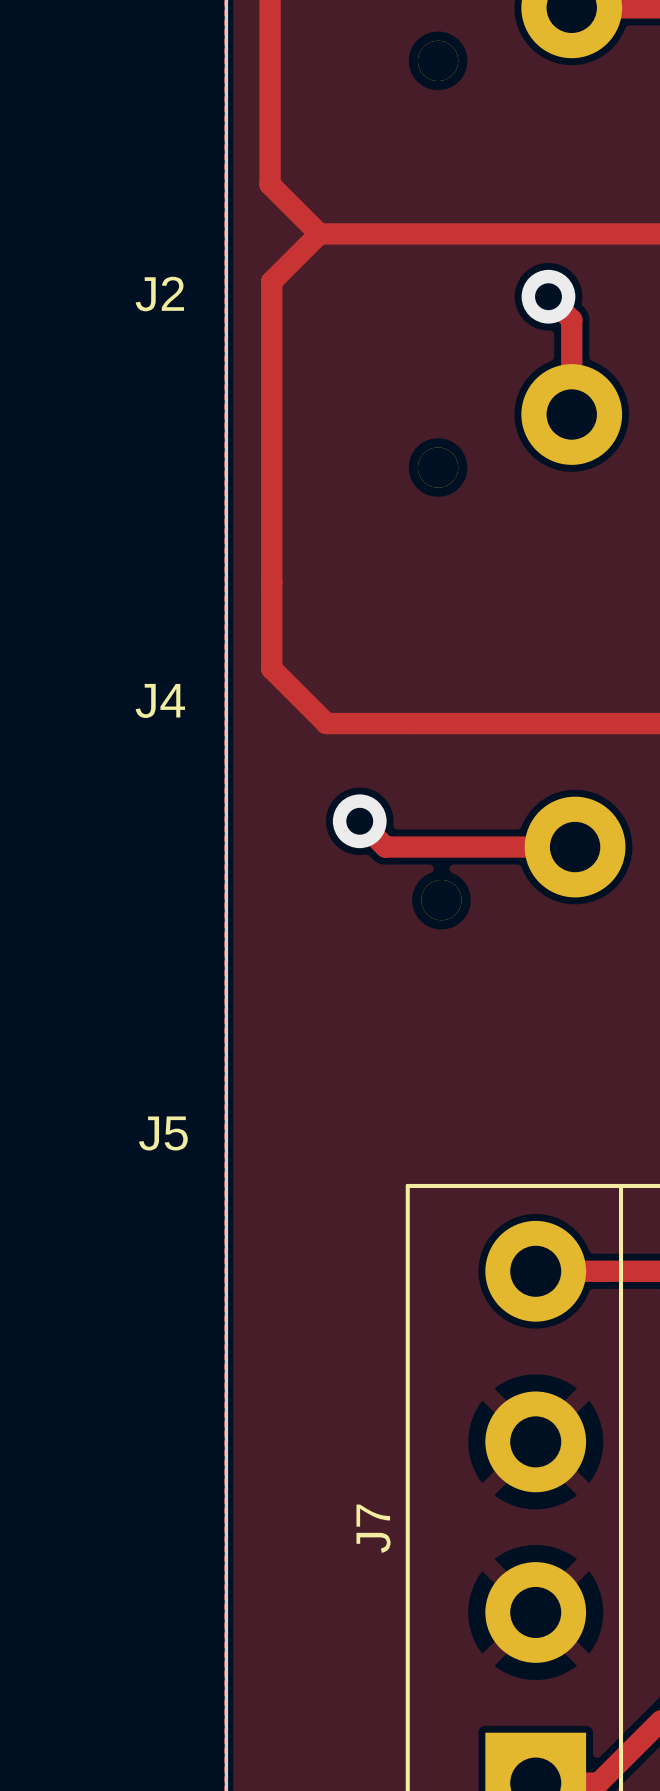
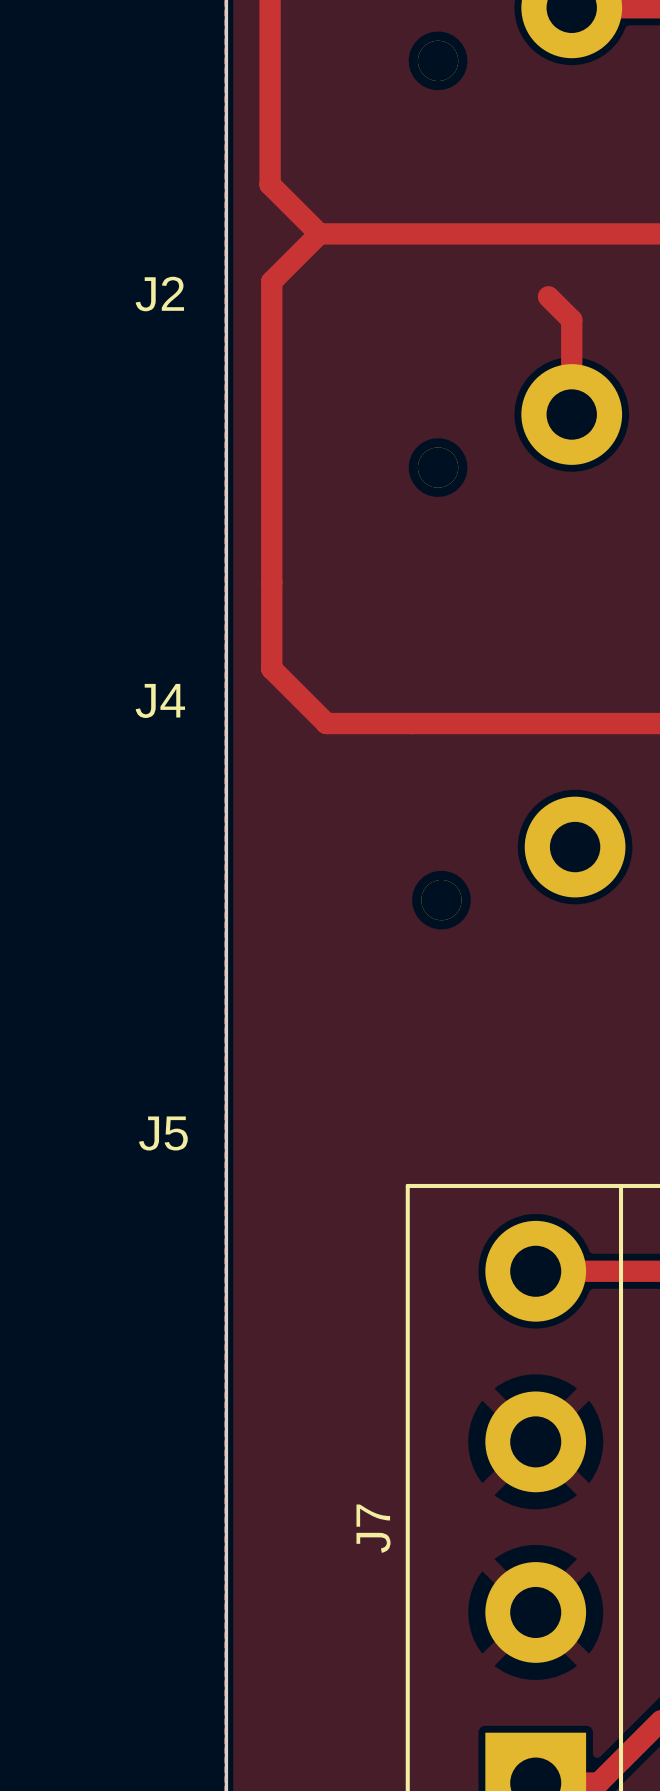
via: (548, 296) -> none
track: (359, 821) (385, 847) (575, 847) -> none
via: (359, 821) -> none

